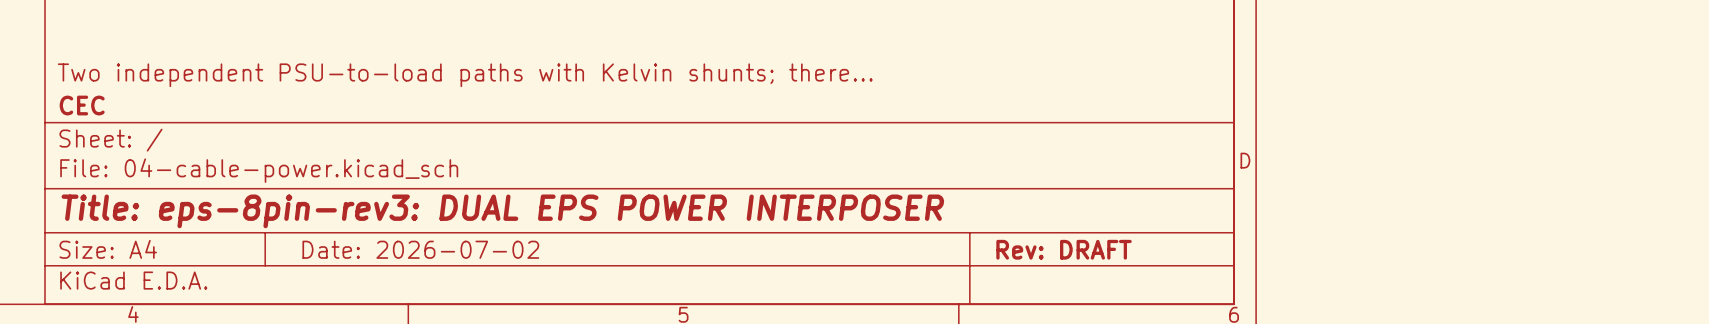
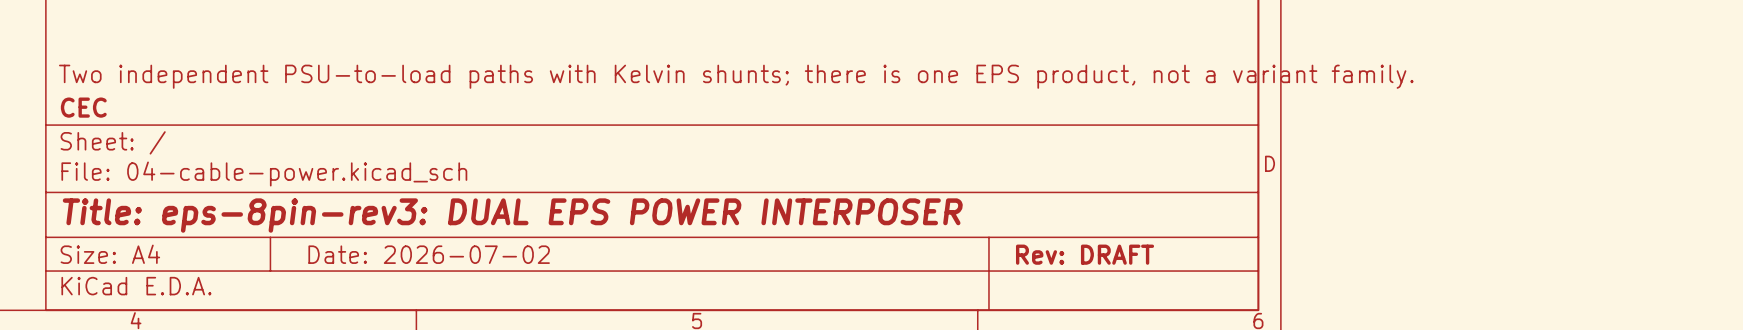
title block: Two independent PSU-to-load paths with Kelvin shunts; there... (465, 75) -> Two independent PSU-to-load paths with Kelvin shunts; there is one EPS product, not a variant family. (736, 76)

